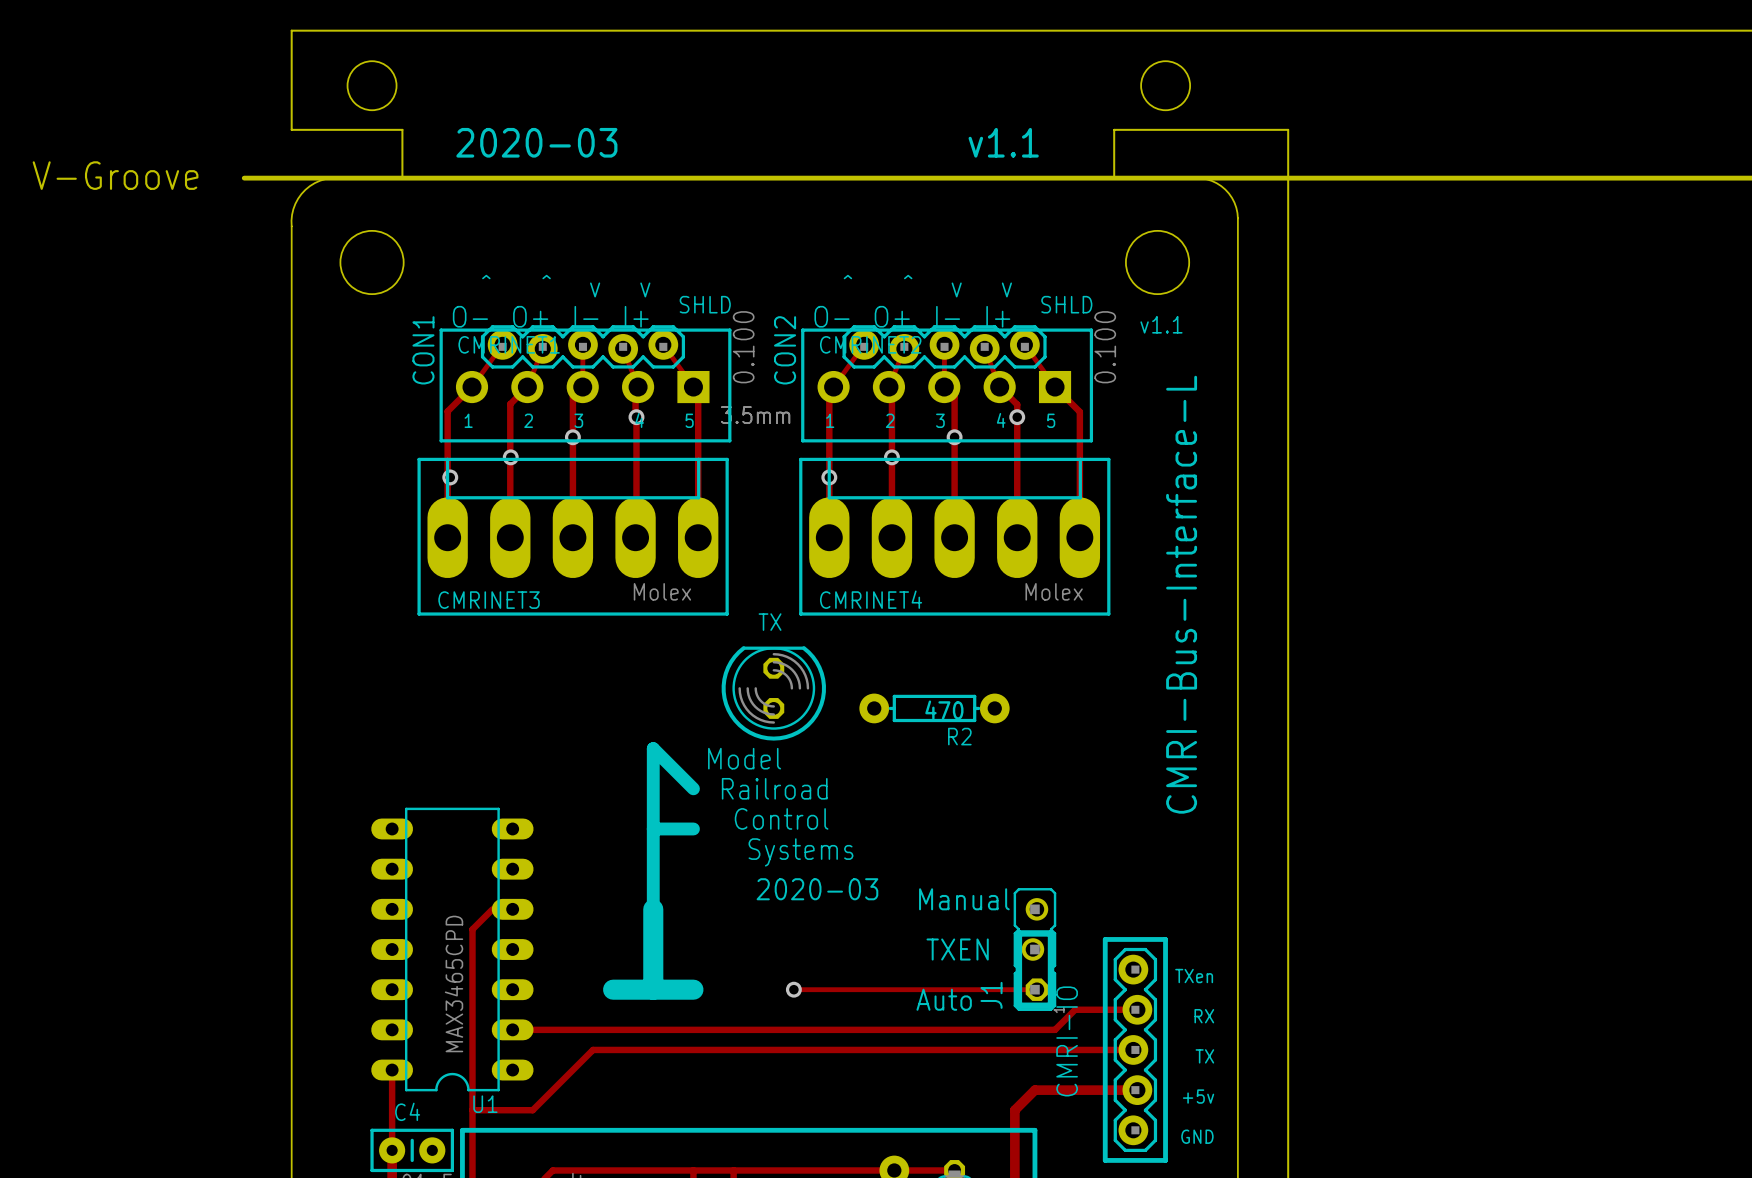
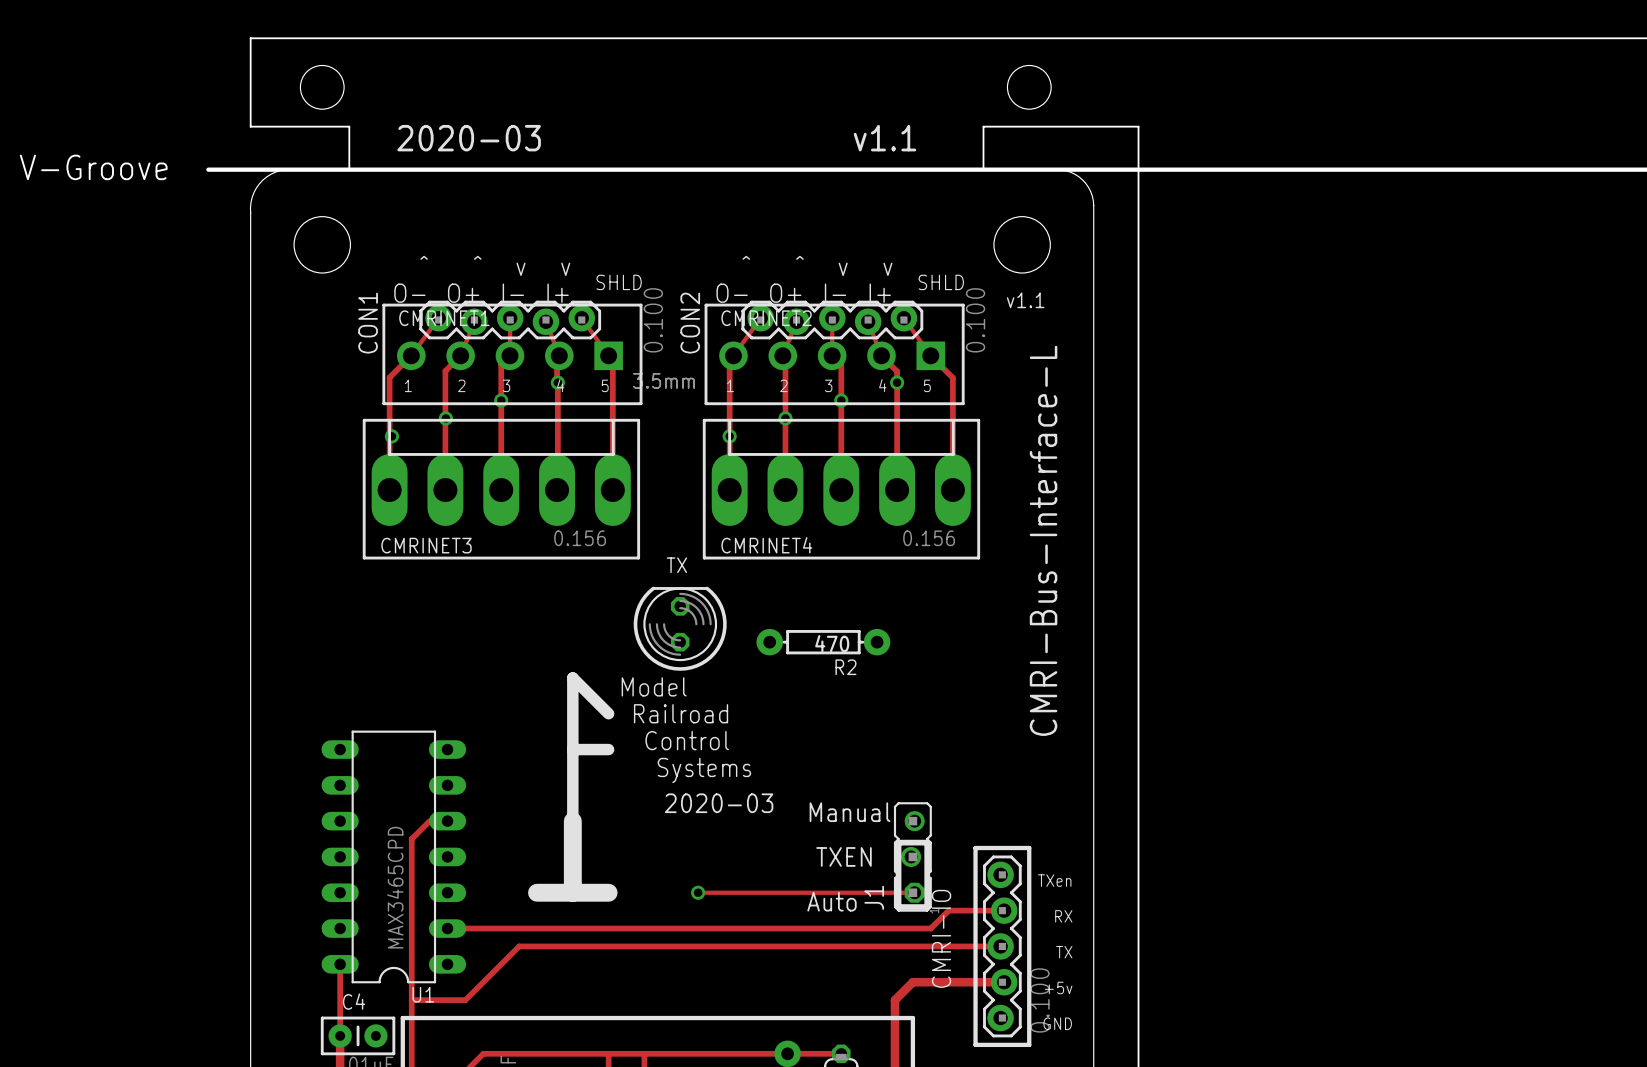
CMRINET3 value: Molex (662, 591) -> 0.156 (580, 538)
CMRINET4 value: Molex (1054, 591) -> 0.156 (929, 538)
CMRI-IO value: none -> 0.100 (1039, 1000)

